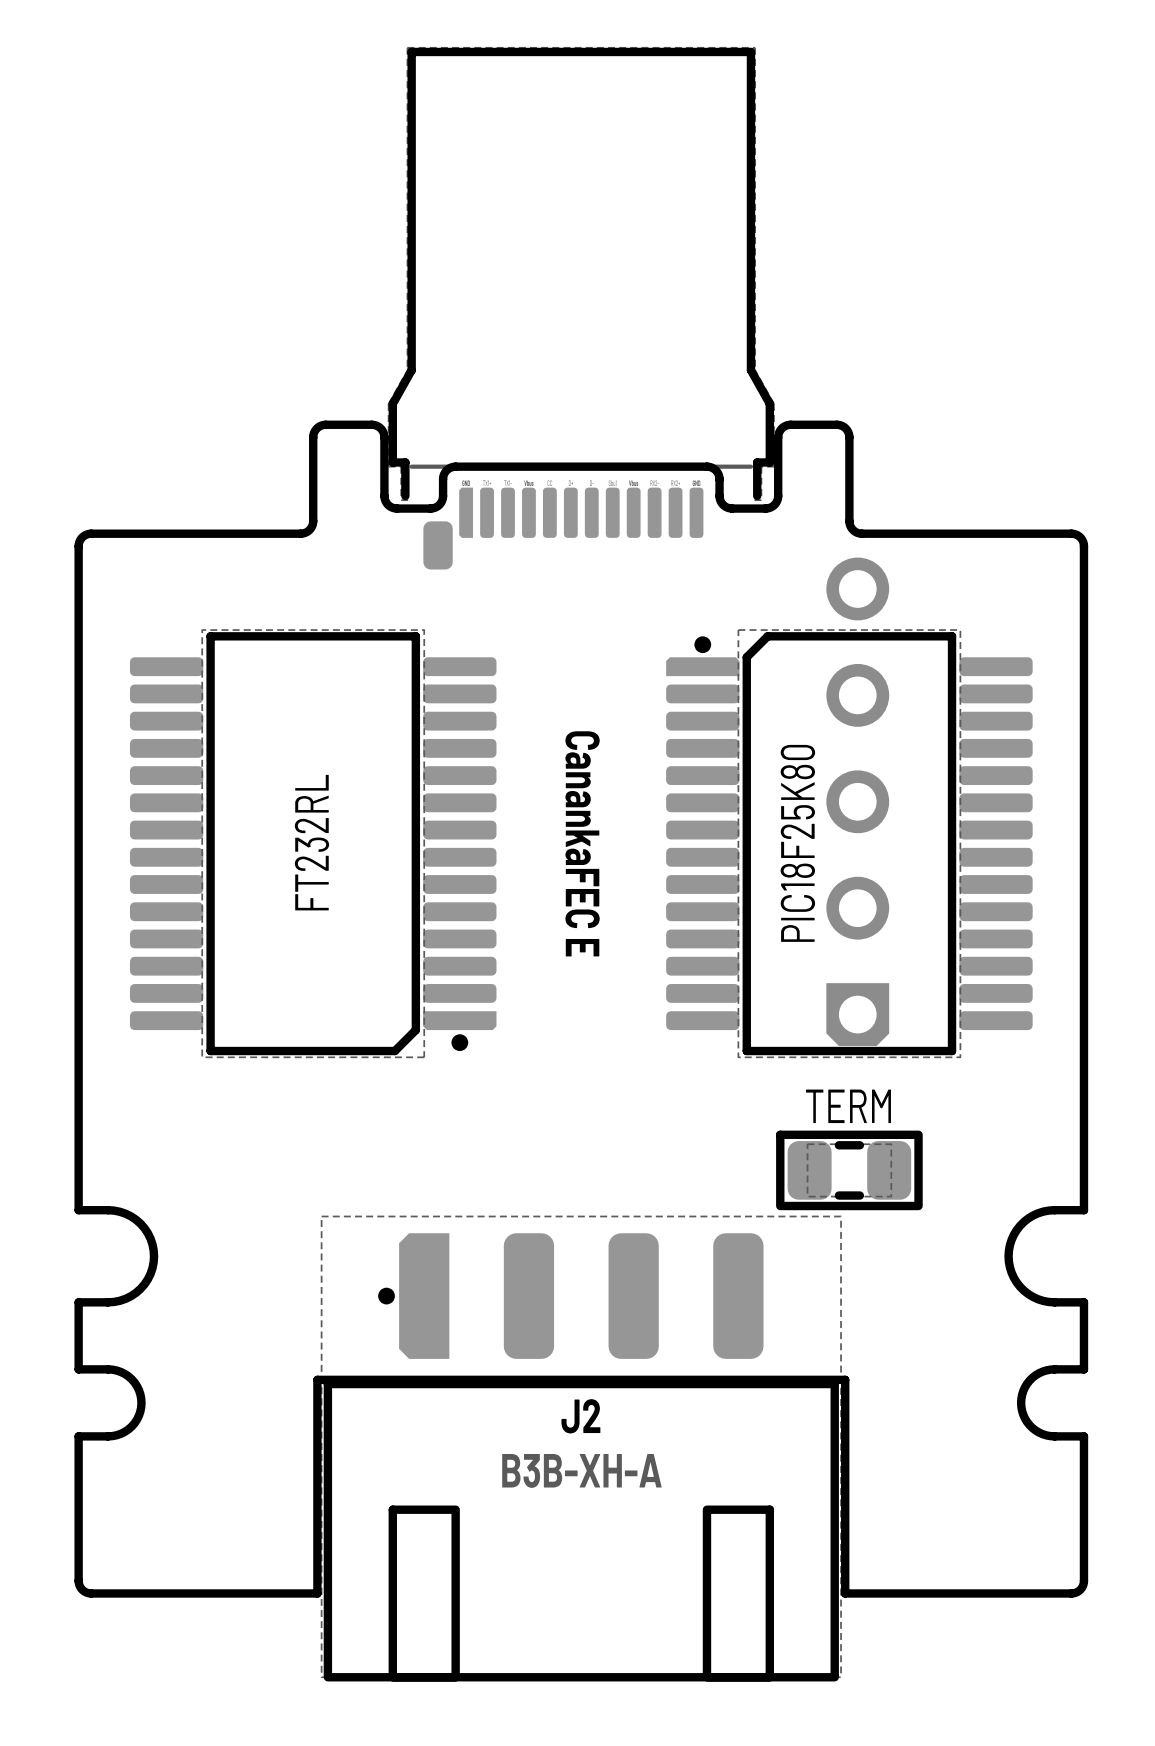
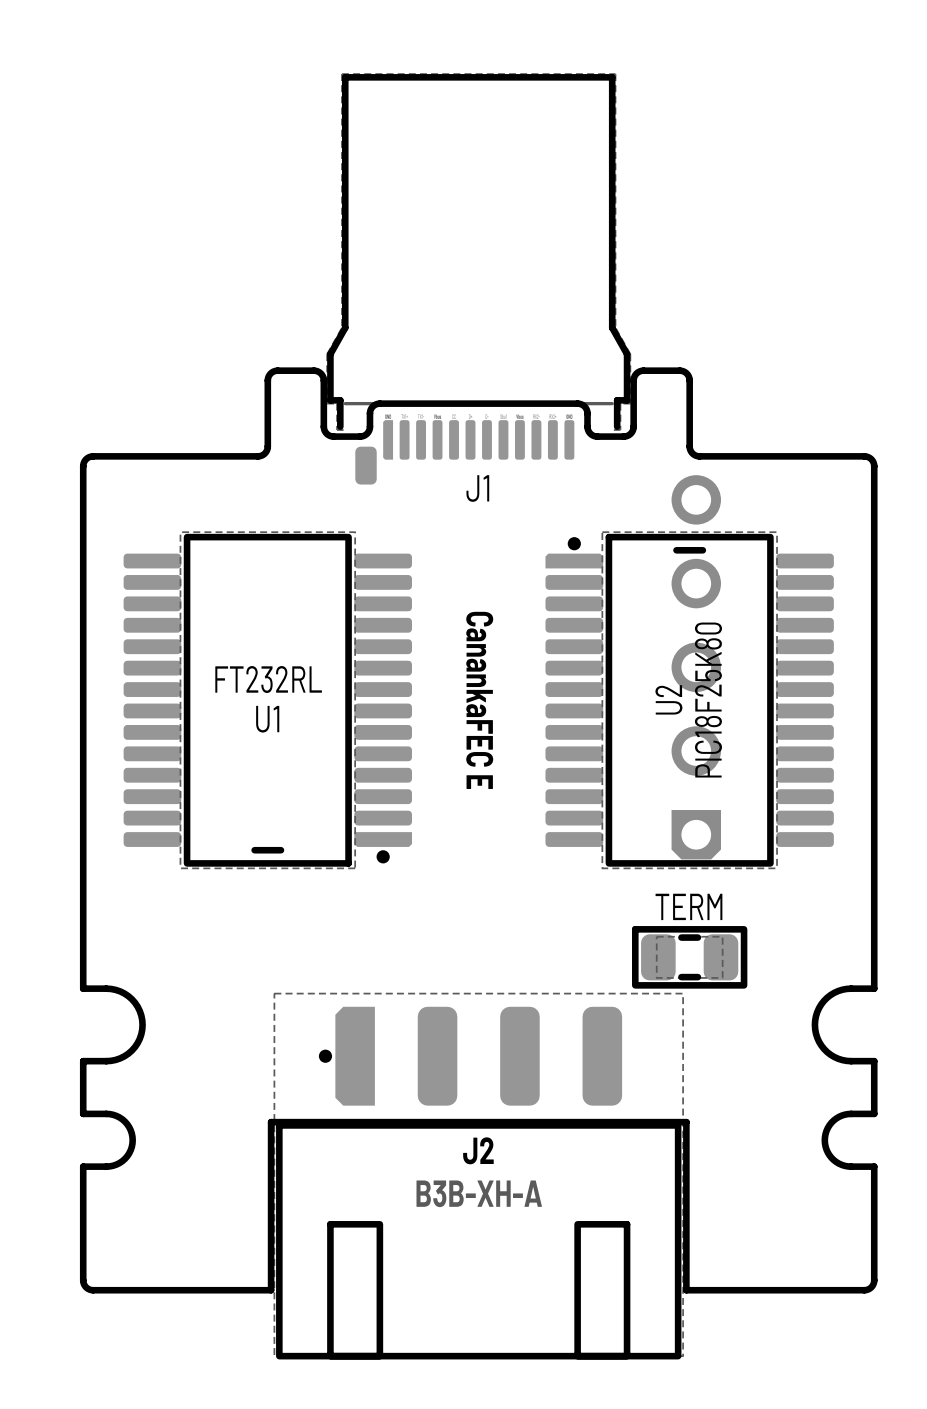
part: (581, 308) -> none
J1: none -> (478, 279)
part: FT232RL (313, 843) -> none
U1: none -> FT232RL (267, 700)
part: PIC18F25K80 (849, 843) -> none
U2: none -> PIC18F25K80 (689, 700)

